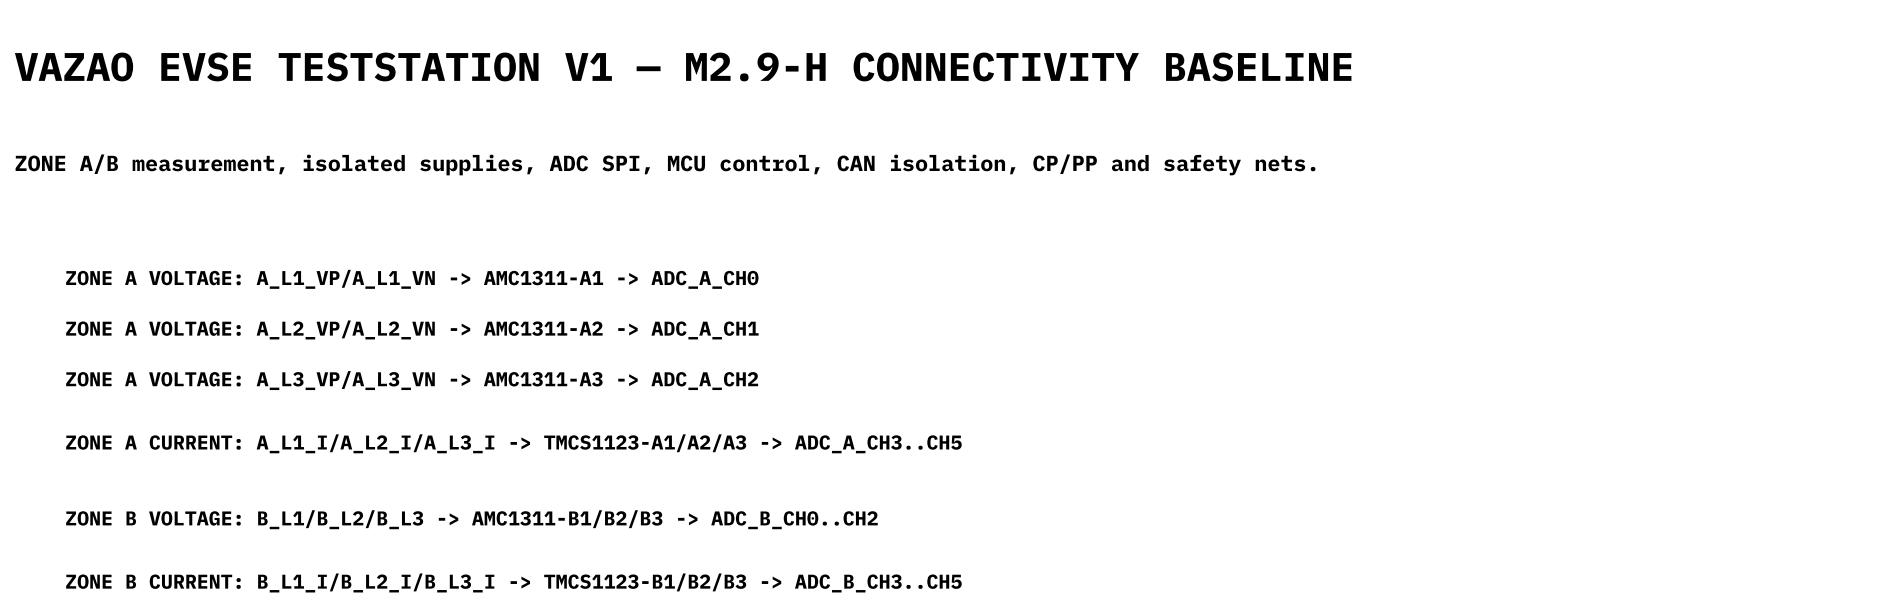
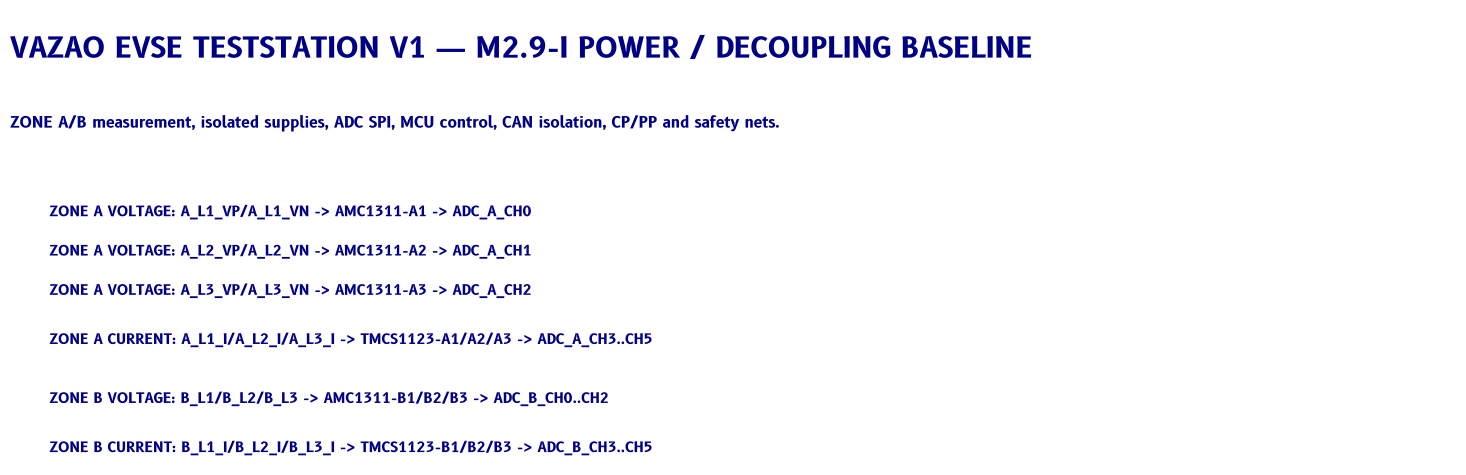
text: VAZAO EVSE TESTSTATION V1 — M2.9-H CONNECTIVITY BASELINE (683, 66) -> VAZAO EVSE TESTSTATION V1 — M2.9-I POWER / DECOUPLING BASELINE (520, 47)

